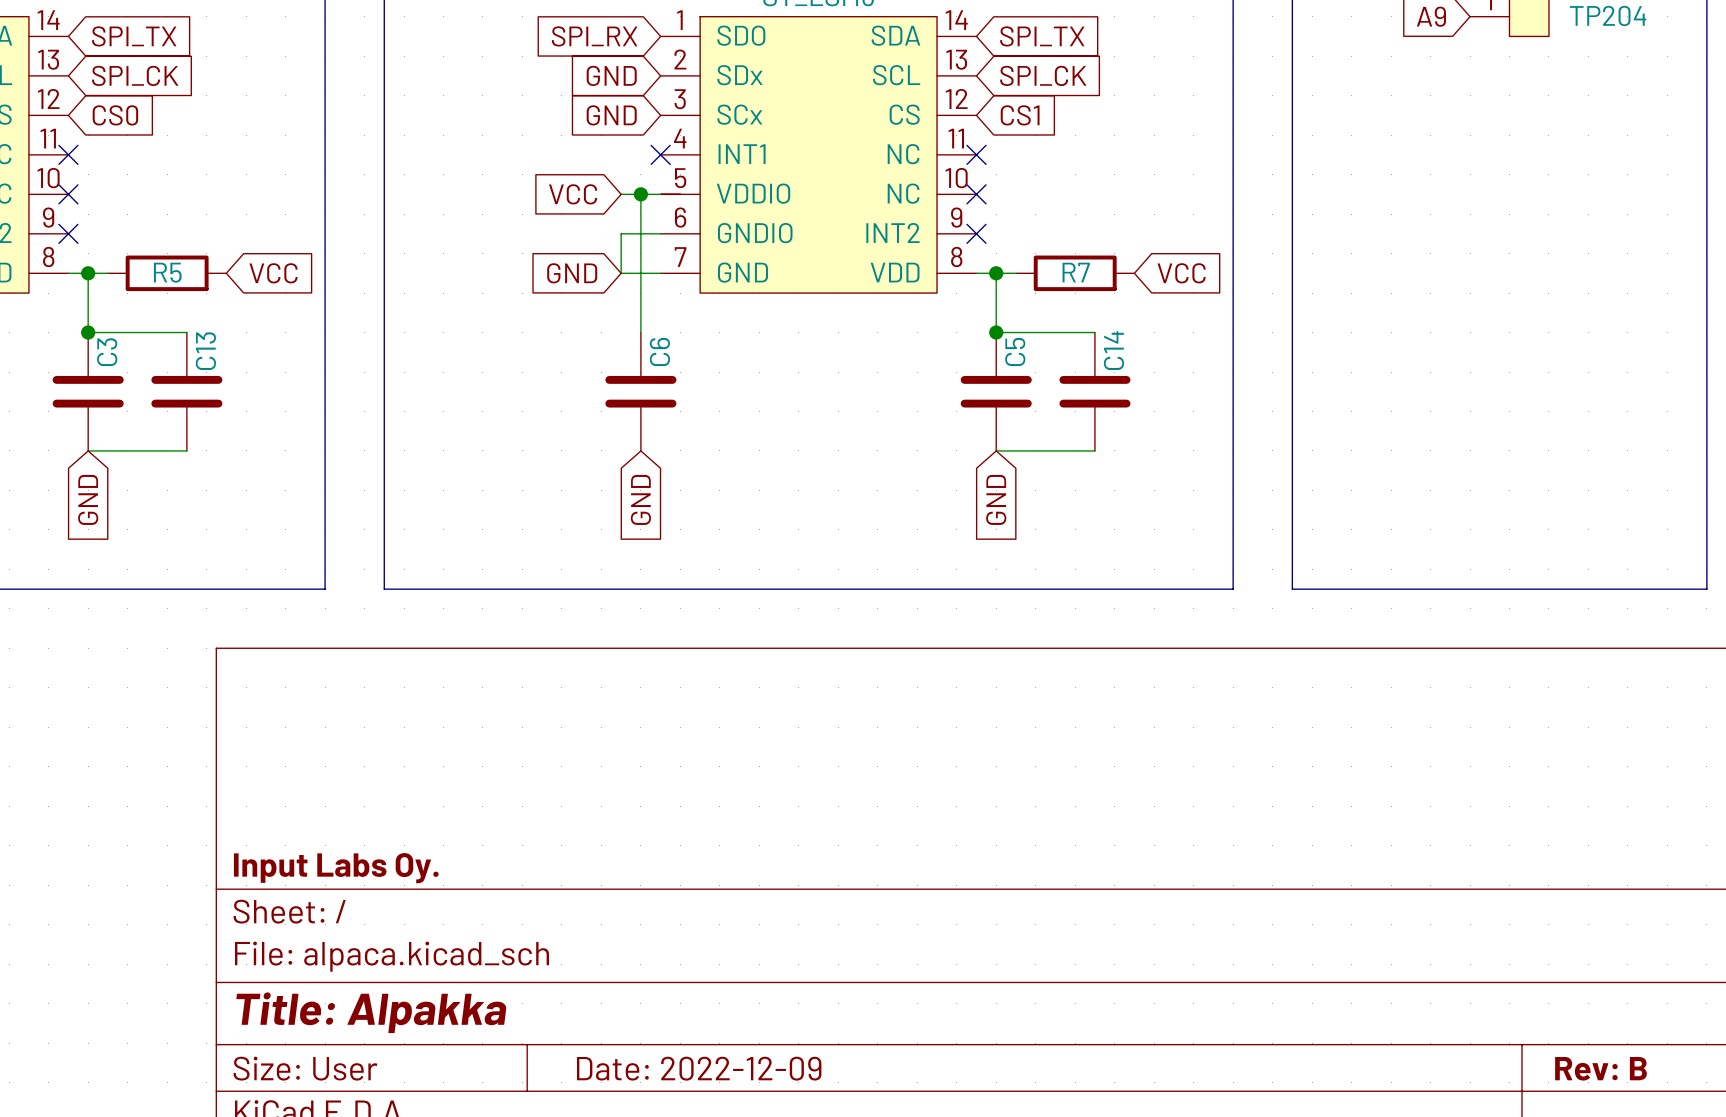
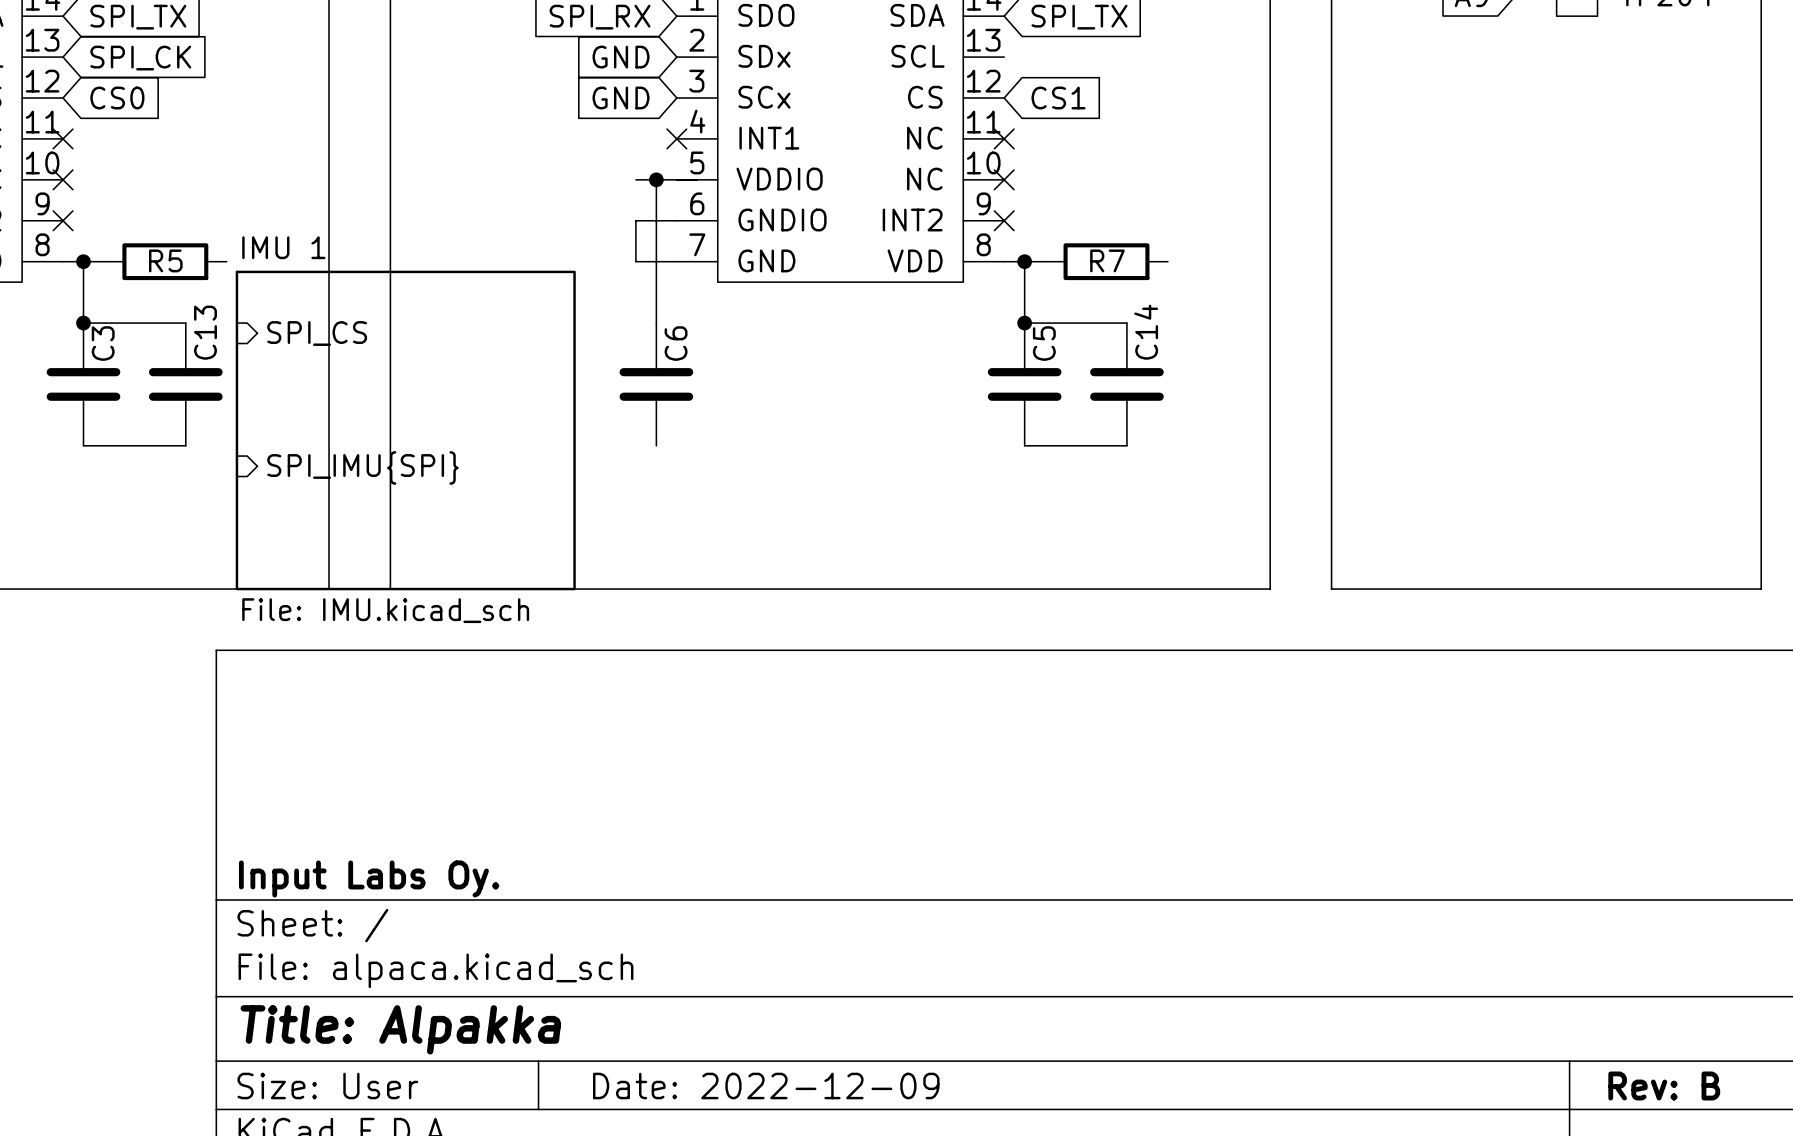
global label: SPI_CK (1043, 75) -> none
global label: VCC (573, 194) -> none
global label: VCC (273, 273) -> none
global label: GND (572, 273) -> none
global label: VCC (1181, 273) -> none
sheet pin: none -> SPI_CS (317, 333)
sheet IMU 1: none -> File: IMU.kicad_sch (405, 430)
sheet pin: none -> SPI_IMU{SPI} (362, 467)
global label: GND (88, 499) -> none
global label: GND (640, 499) -> none
global label: GND (996, 499) -> none

